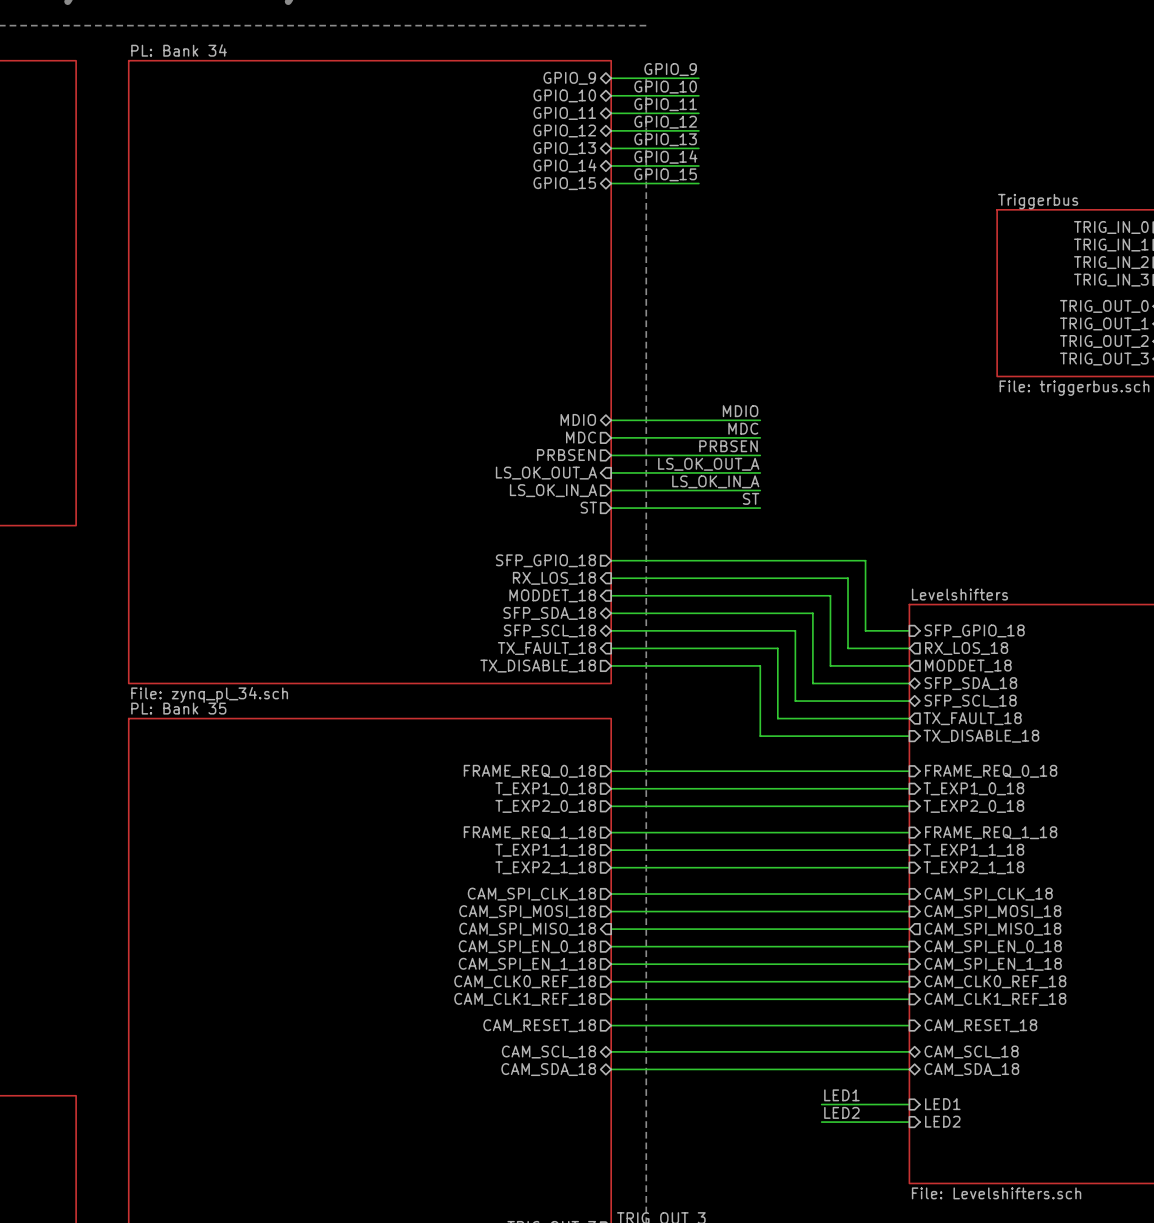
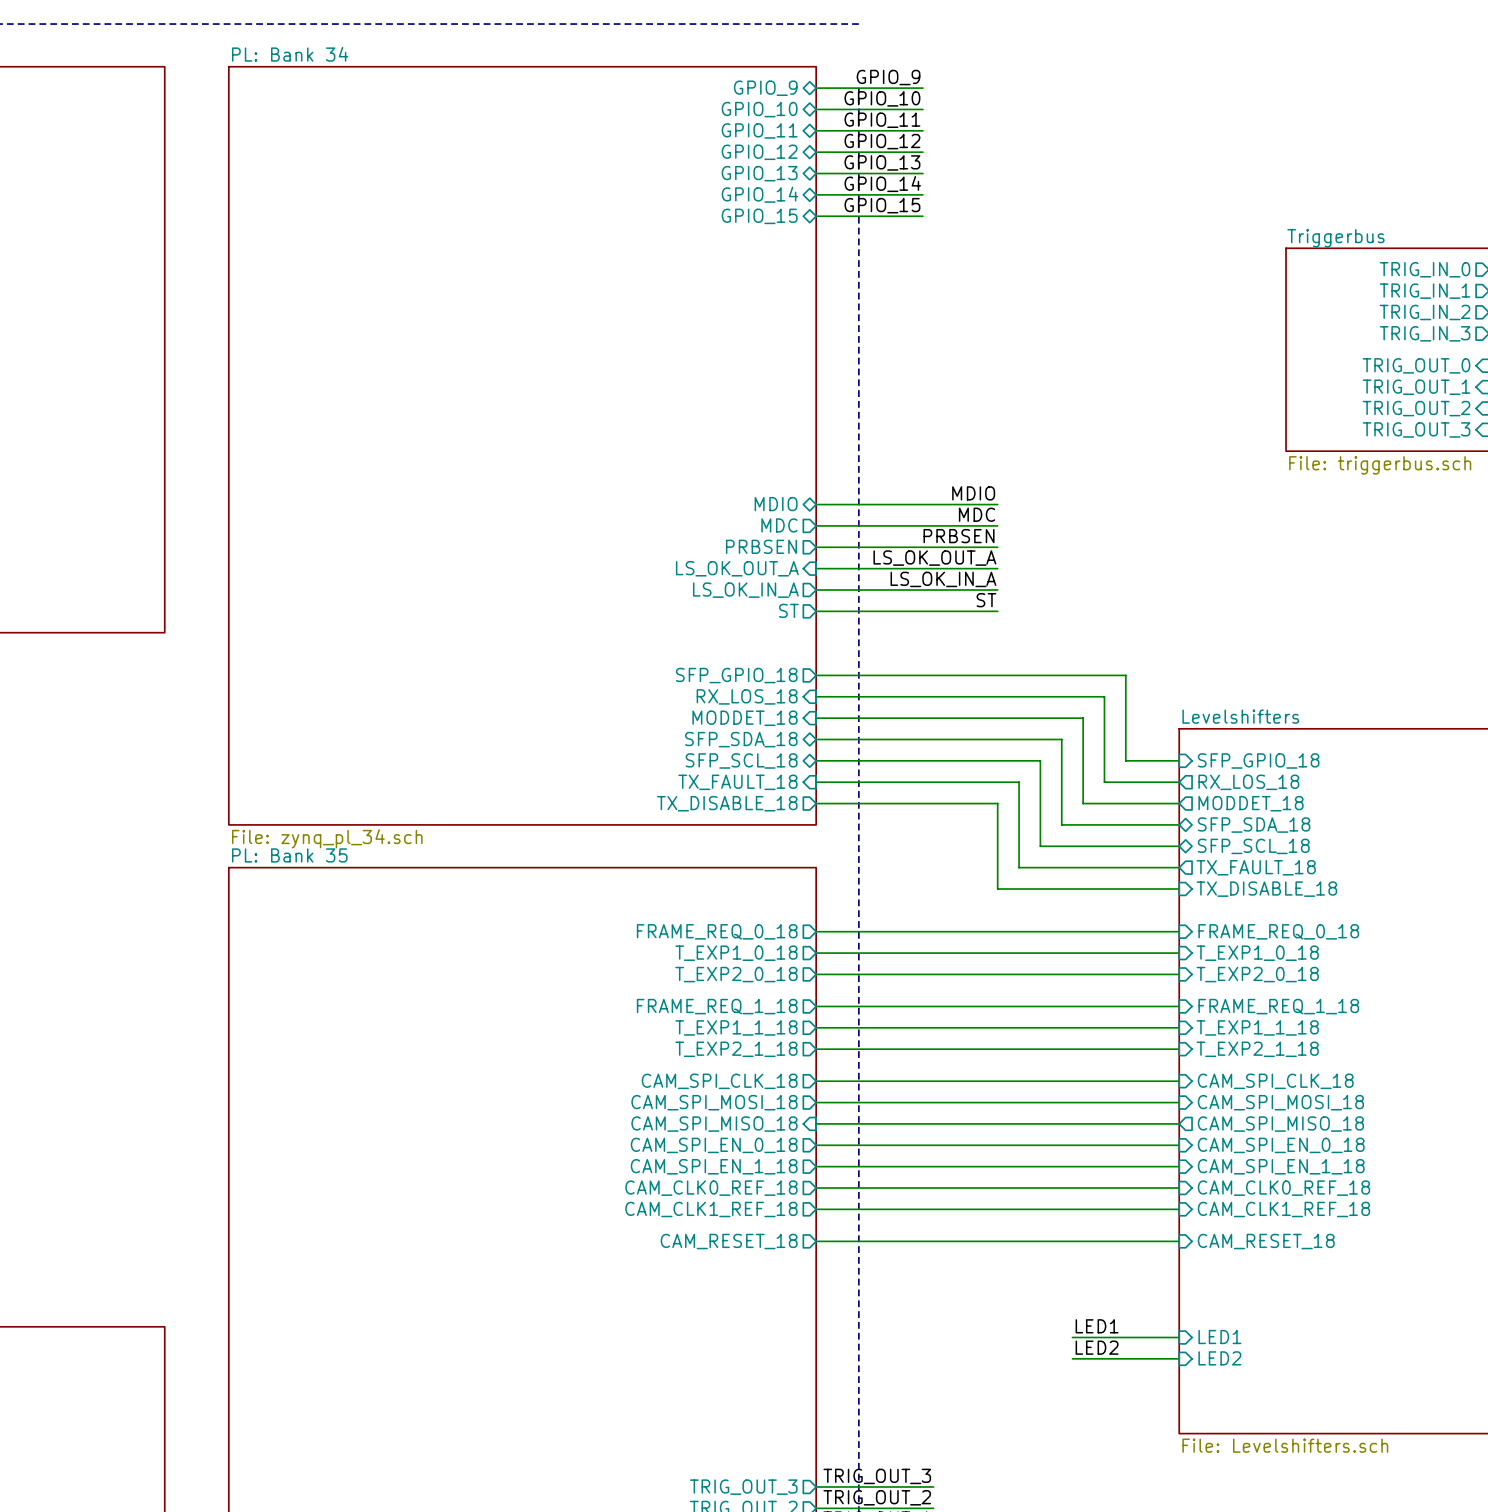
wire: (611, 1051) (909, 1051) -> none
sheet pin: CAM_SCL_18 (548, 1052) -> none
sheet pin: CAM_SCL_18 (971, 1052) -> none
sheet pin: CAM_SDA_18 (548, 1069) -> none
wire: (611, 1069) (909, 1069) -> none
sheet pin: CAM_SDA_18 (971, 1069) -> none

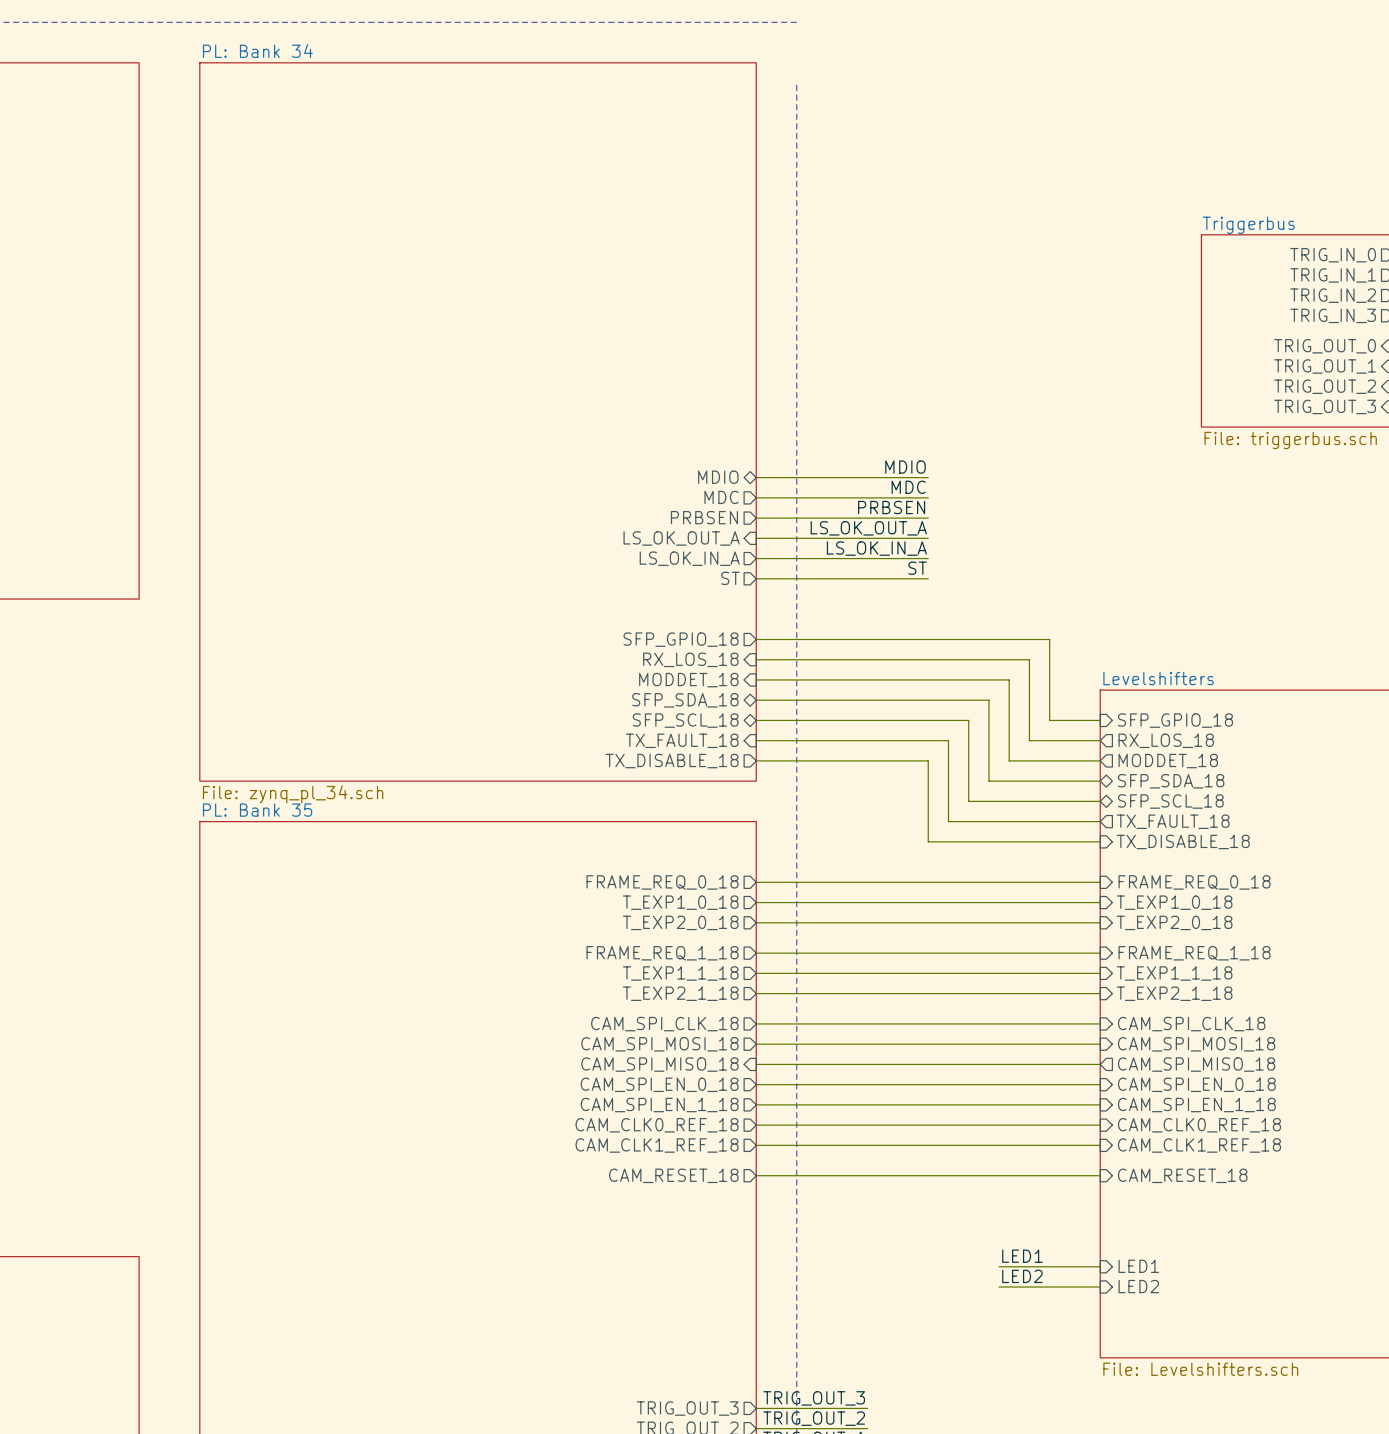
label: GPIO_9 (888, 77) -> none
sheet pin: GPIO_9 (765, 88) -> none
wire: (816, 88) (922, 88) -> none
label: GPIO_10 (882, 98) -> none
sheet pin: GPIO_10 (759, 109) -> none
wire: (816, 109) (922, 109) -> none
label: GPIO_11 (882, 120) -> none
sheet pin: GPIO_11 (759, 130) -> none
wire: (816, 130) (922, 130) -> none
label: GPIO_12 (882, 141) -> none
sheet pin: GPIO_12 (759, 152) -> none
wire: (816, 152) (922, 152) -> none
label: GPIO_13 (882, 162) -> none
sheet pin: GPIO_13 (759, 173) -> none
wire: (816, 173) (922, 173) -> none
label: GPIO_14 (882, 184) -> none
sheet pin: GPIO_14 (759, 194) -> none
wire: (816, 194) (922, 194) -> none
label: GPIO_15 (882, 205) -> none
sheet pin: GPIO_15 (759, 216) -> none
wire: (816, 216) (922, 216) -> none

